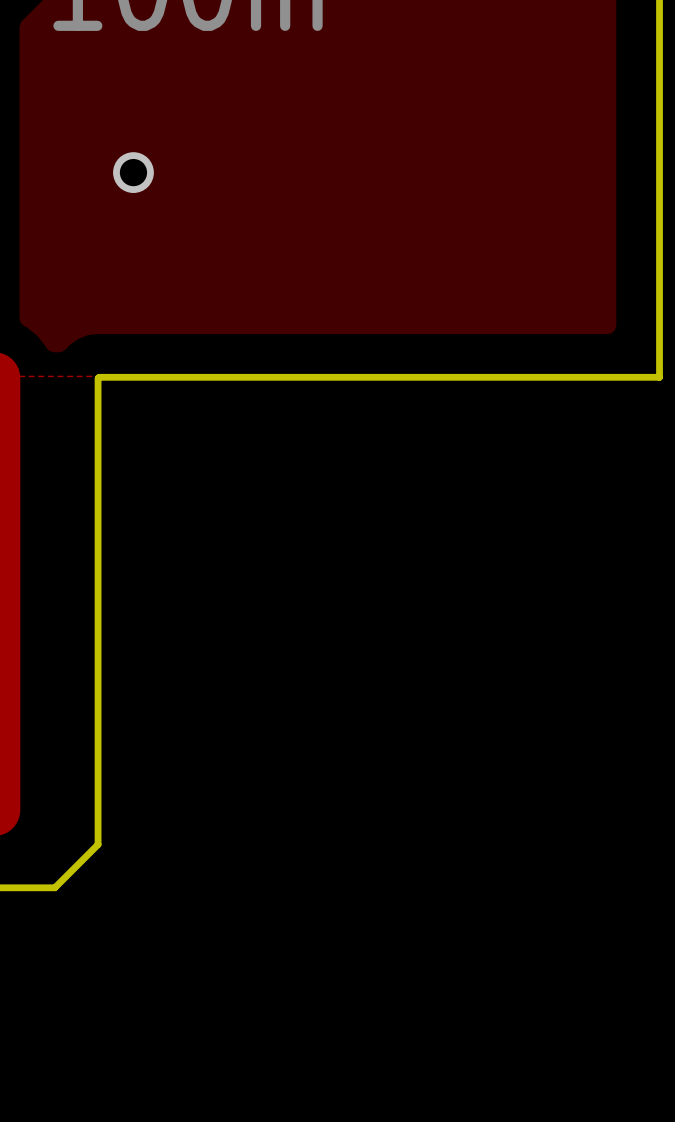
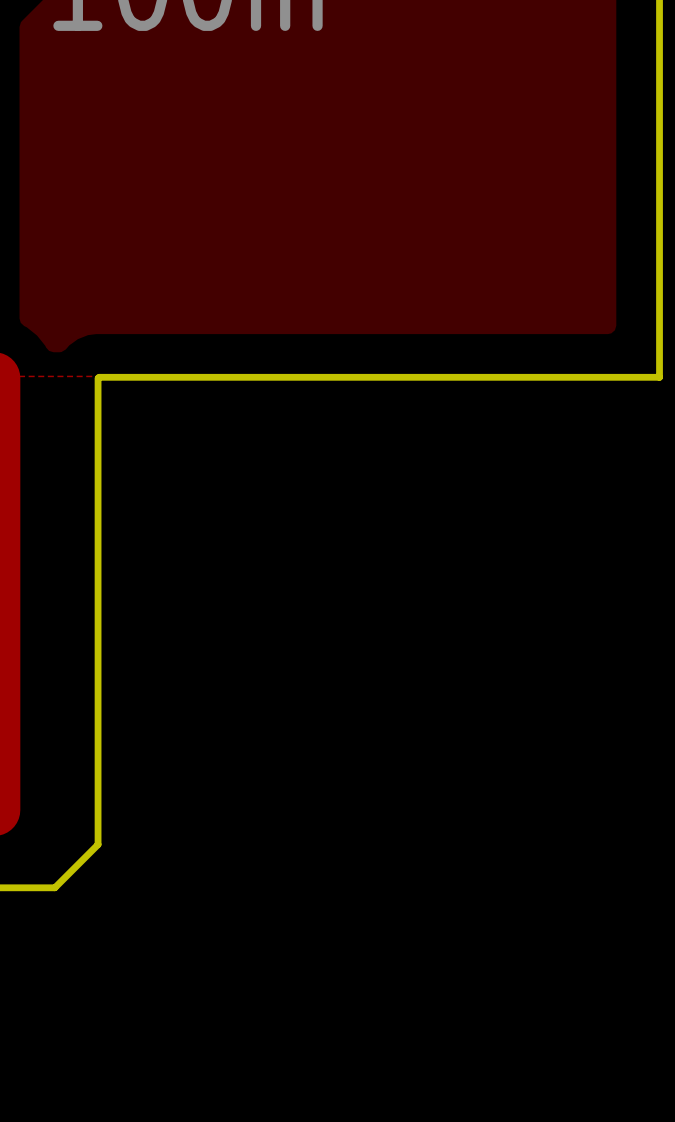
via: (133, 172) -> none

